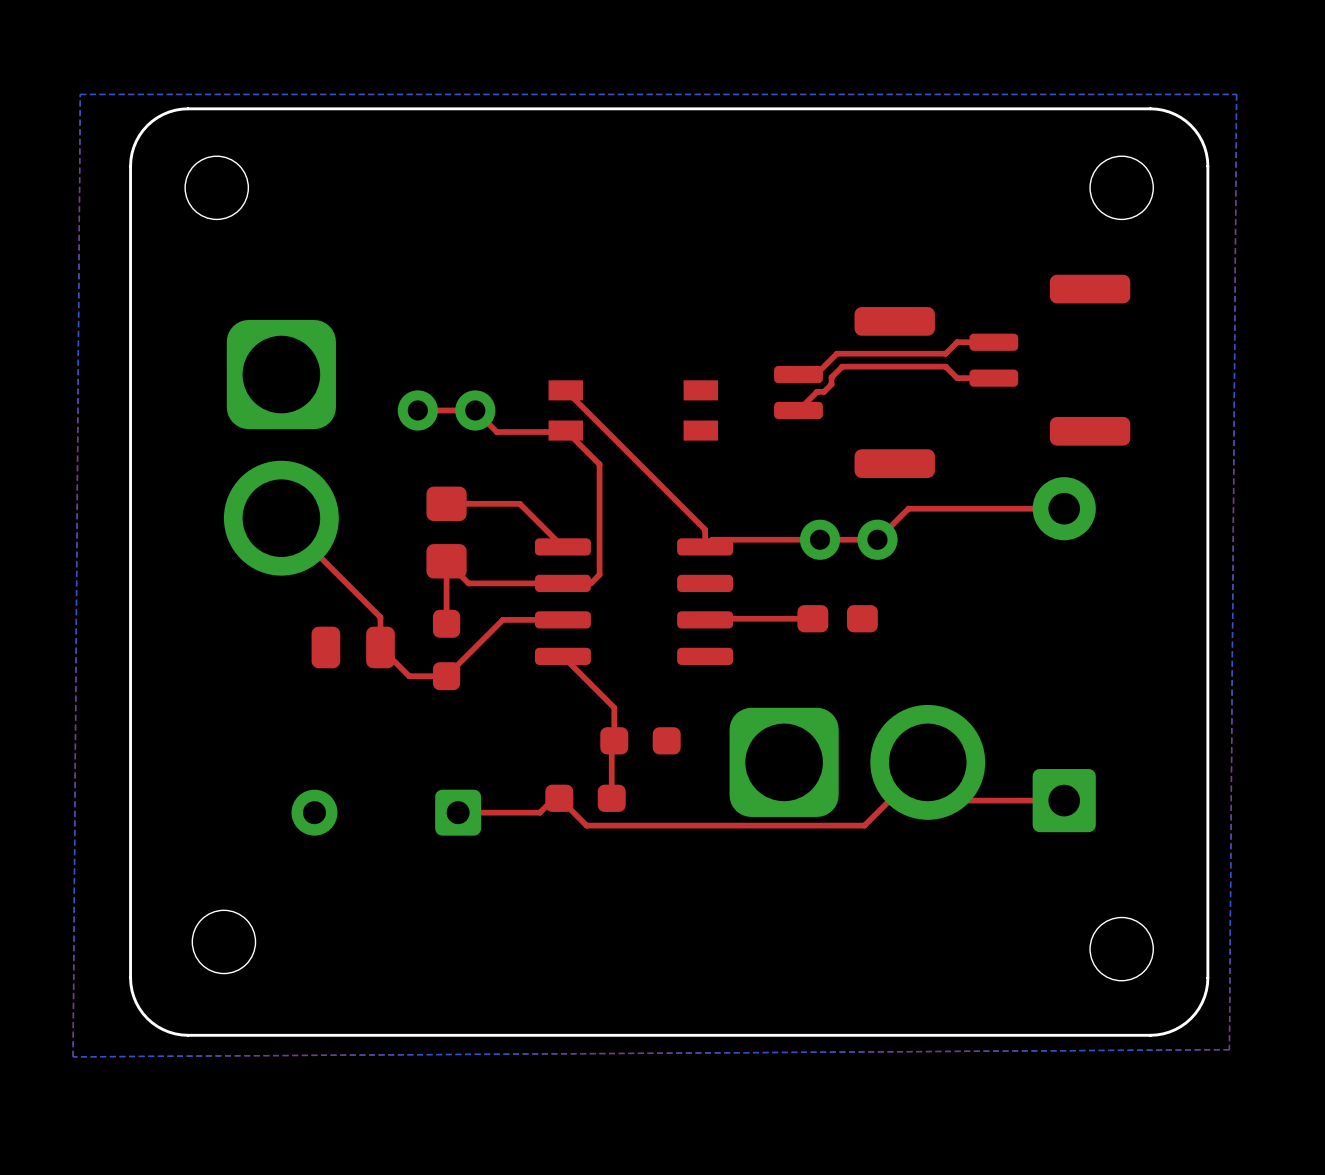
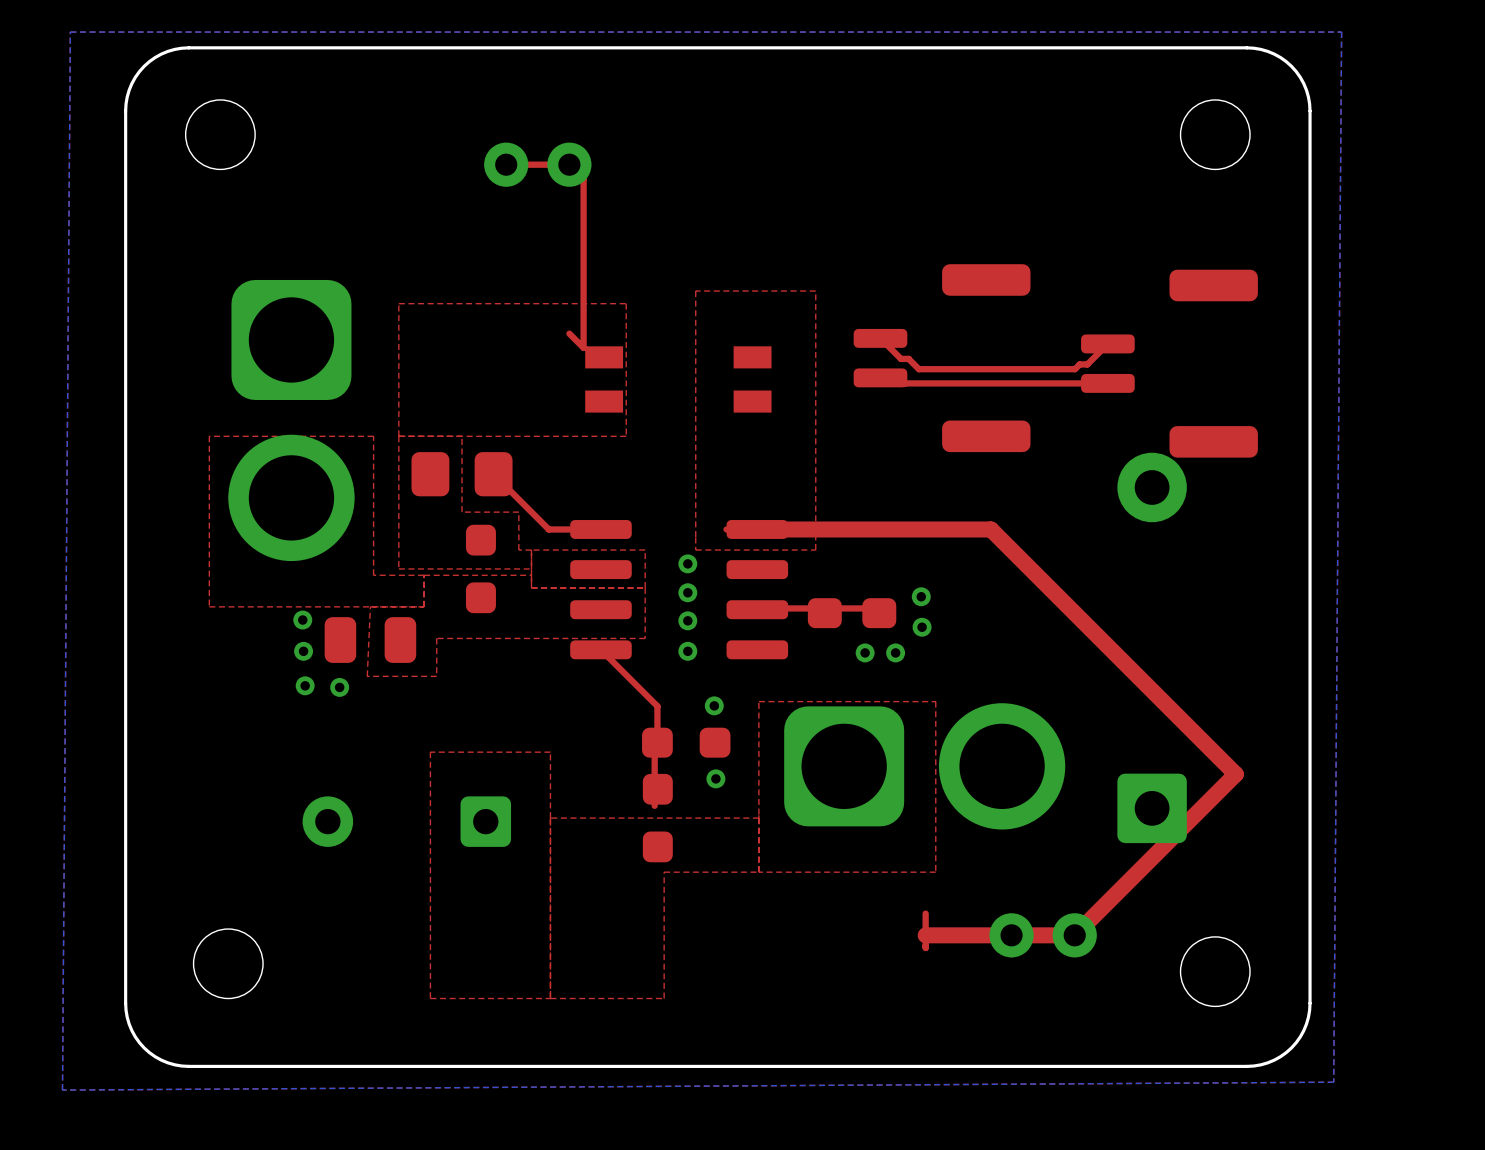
top track: none -> (506, 164) (569, 164) (583, 178) (583, 347) (569, 333)
top zone outline: none -> (815, 291) (815, 550) (695, 550) (695, 291) (815, 291)
top track: (993, 342) (957, 342) (945, 353) (836, 353) (816, 374) (798, 374) -> none
part position: (1049, 360) -> (1169, 363)
top track: none -> (880, 338) (900, 358) (908, 358) (918, 369) (1074, 369) (1079, 364) (1087, 364) (1107, 343)
top track: (993, 378) (957, 378) (945, 366) (842, 366) (831, 377) (831, 384) (824, 391) (817, 391) (798, 410) -> none
top track: (565, 390) (705, 529) (705, 546) (712, 539) (877, 539) (908, 508) (1064, 508) -> none
part position: (854, 392) -> (942, 358)
top track: none -> (880, 377) (899, 377) (905, 383) (1107, 383)
top track: (417, 410) (475, 410) (496, 432) (565, 430) (599, 464) (599, 574) (590, 583) (468, 583) (446, 561) (446, 623) -> none
part position: (446, 410) -> (537, 164)
top zone outline: none -> (398, 436) (626, 436) (626, 303) (398, 303) (398, 568) (531, 568)
top zone outline: none -> (462, 436) (462, 512) (518, 512) (518, 550) (645, 550) (645, 638) (436, 638) (436, 676) (367, 676) (370, 606)
top track: (446, 503) (519, 503) (562, 546) -> (493, 474) (548, 529) (600, 529)
top track: (281, 518) (380, 617) (380, 647) (409, 676) (446, 676) (502, 619) (562, 619) -> none
part rotation: 0° (446, 532) -> 90° clockwise (462, 474)
part: (848, 539) -> none
top track: none -> (726, 529) (991, 529) (1235, 774) (1074, 935) (925, 935)
top zone outline: none -> (531, 550) (531, 587) (645, 587)
via: none -> (687, 563)
top zone outline: none -> (531, 575) (373, 575) (373, 436) (209, 436) (209, 606) (424, 606) (424, 575)
via: none -> (687, 592)
via: none -> (921, 596)
part position: (837, 618) -> (852, 613)
via: none -> (302, 620)
via: none -> (687, 620)
via: none -> (922, 627)
part position: (446, 649) -> (480, 568)
via: none -> (303, 651)
via: none -> (687, 651)
via: none -> (865, 652)
via: none -> (895, 652)
via: none -> (305, 685)
via: none -> (339, 687)
via: none -> (714, 705)
via: none -> (715, 778)
part rotation: 0° (585, 798) -> 90° clockwise (657, 818)
top track: (1064, 800) (965, 800) (927, 762) (864, 825) (586, 825) (559, 798) (554, 798) (539, 812) (458, 812) -> none
top zone outline: none -> (758, 818) (550, 818)
top zone outline: none -> (758, 872) (758, 701) (935, 701) (935, 872) (664, 872) (664, 998) (430, 998) (430, 752) (550, 752) (550, 998)
top track: none -> (925, 913) (925, 947)
part: none -> (1043, 935)

